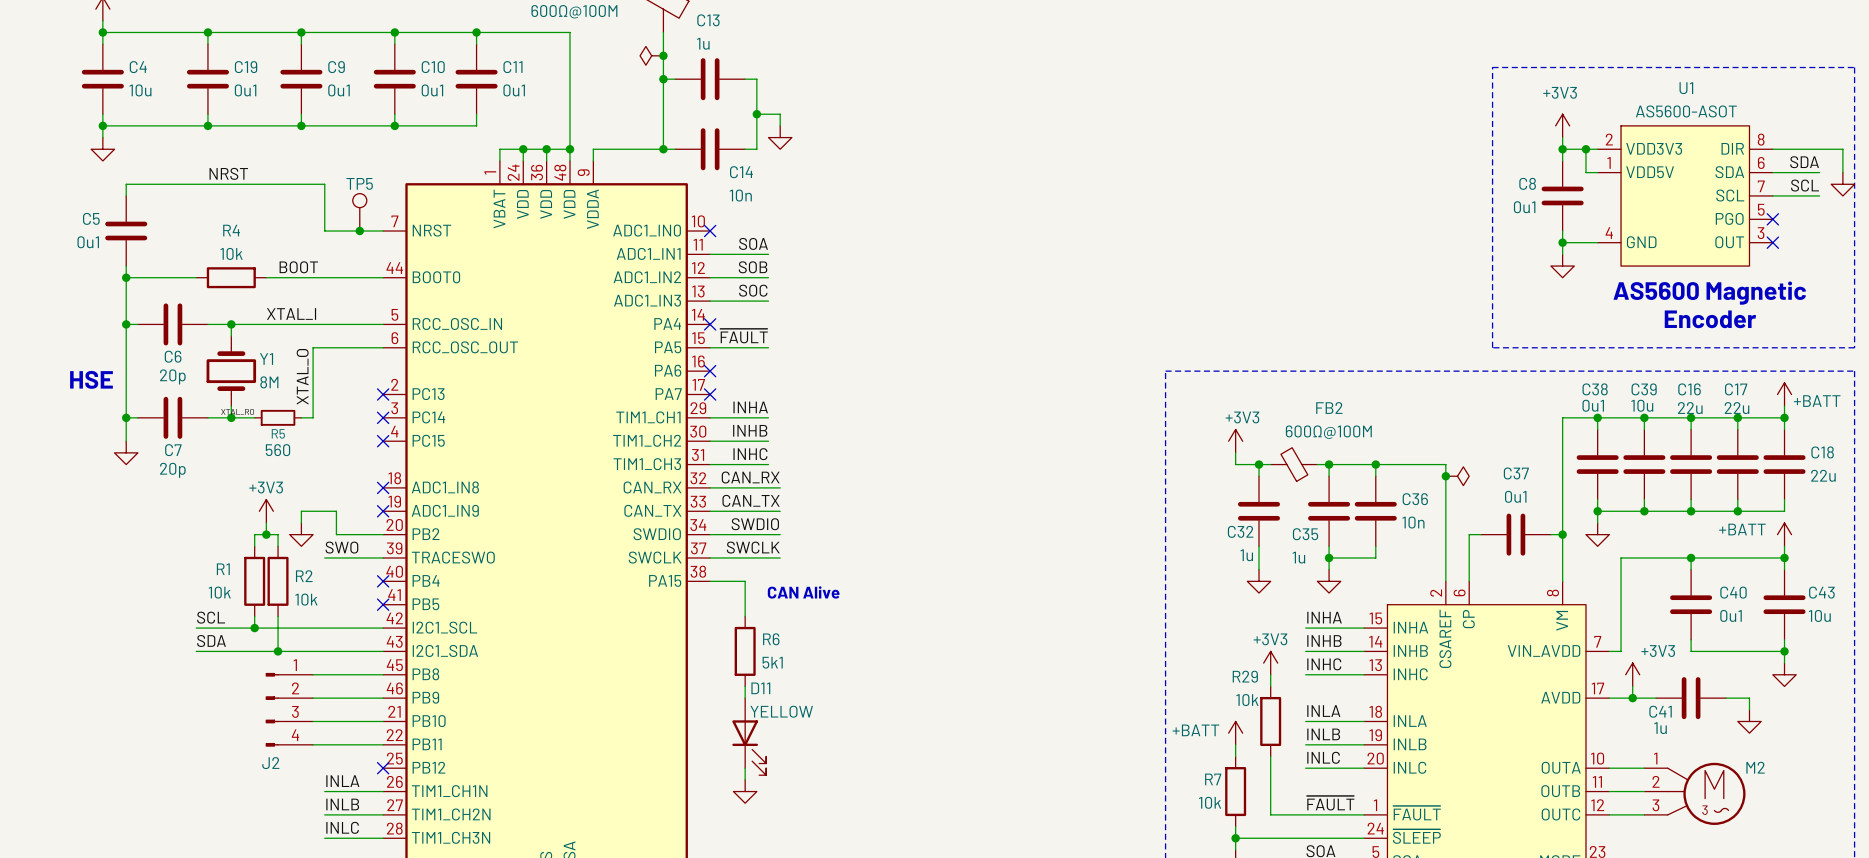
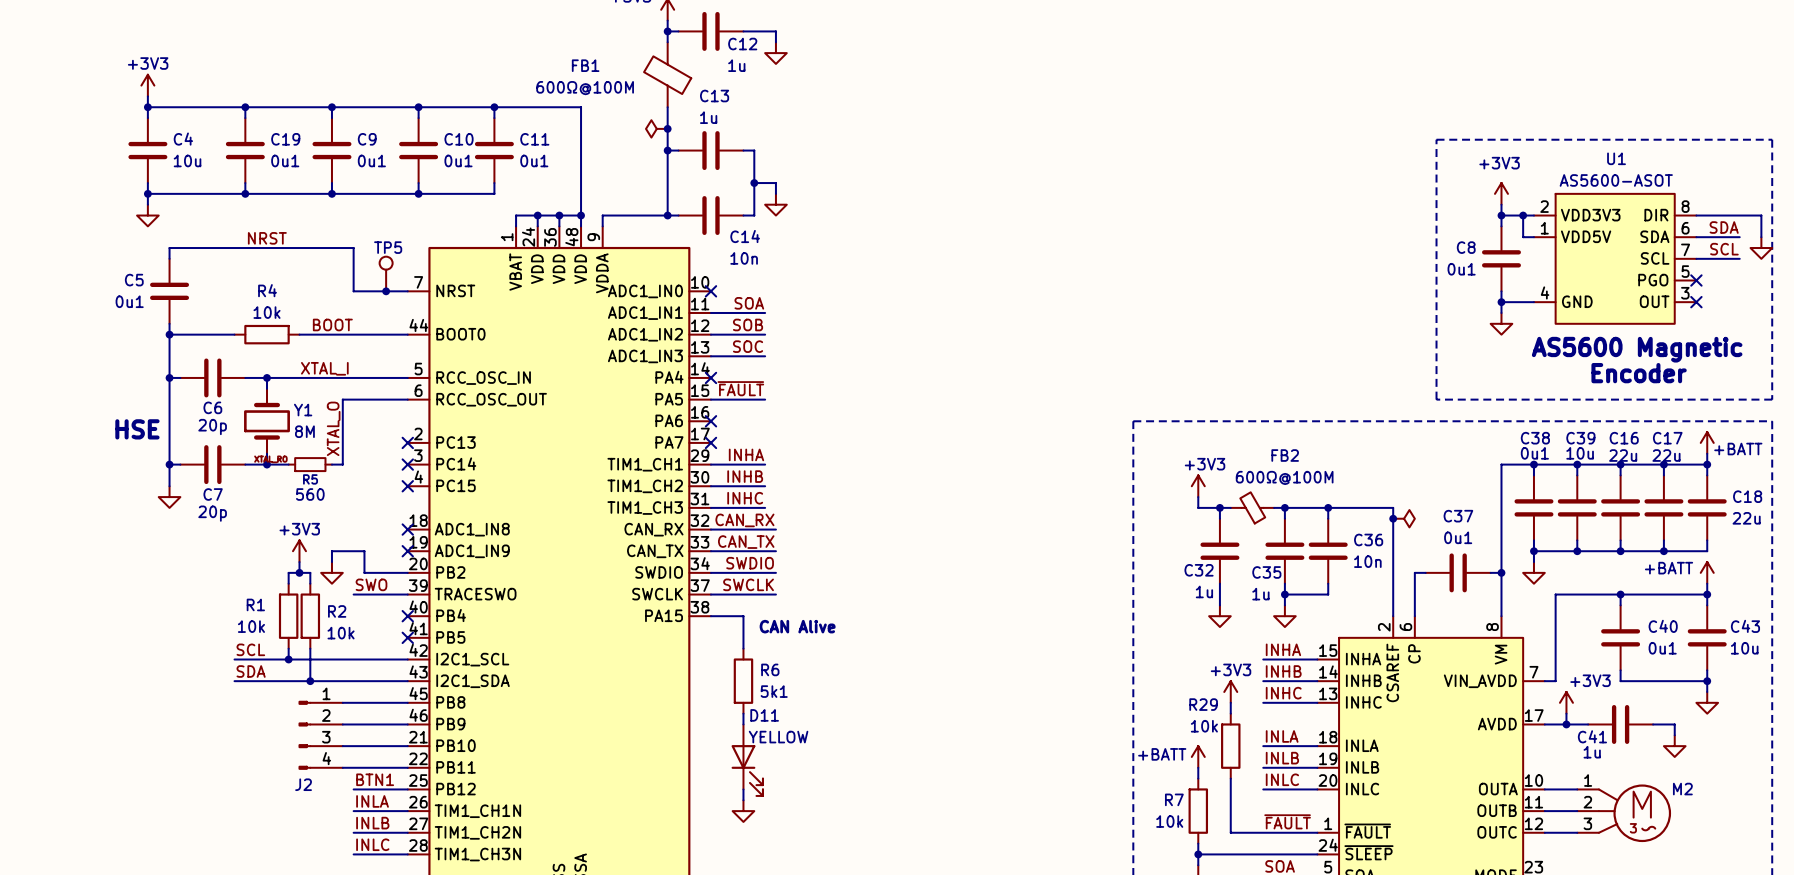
label: none -> BTN1 (375, 779)
wire: none -> (353, 789) (407, 789)
no-connect mark: (383, 768) -> none

